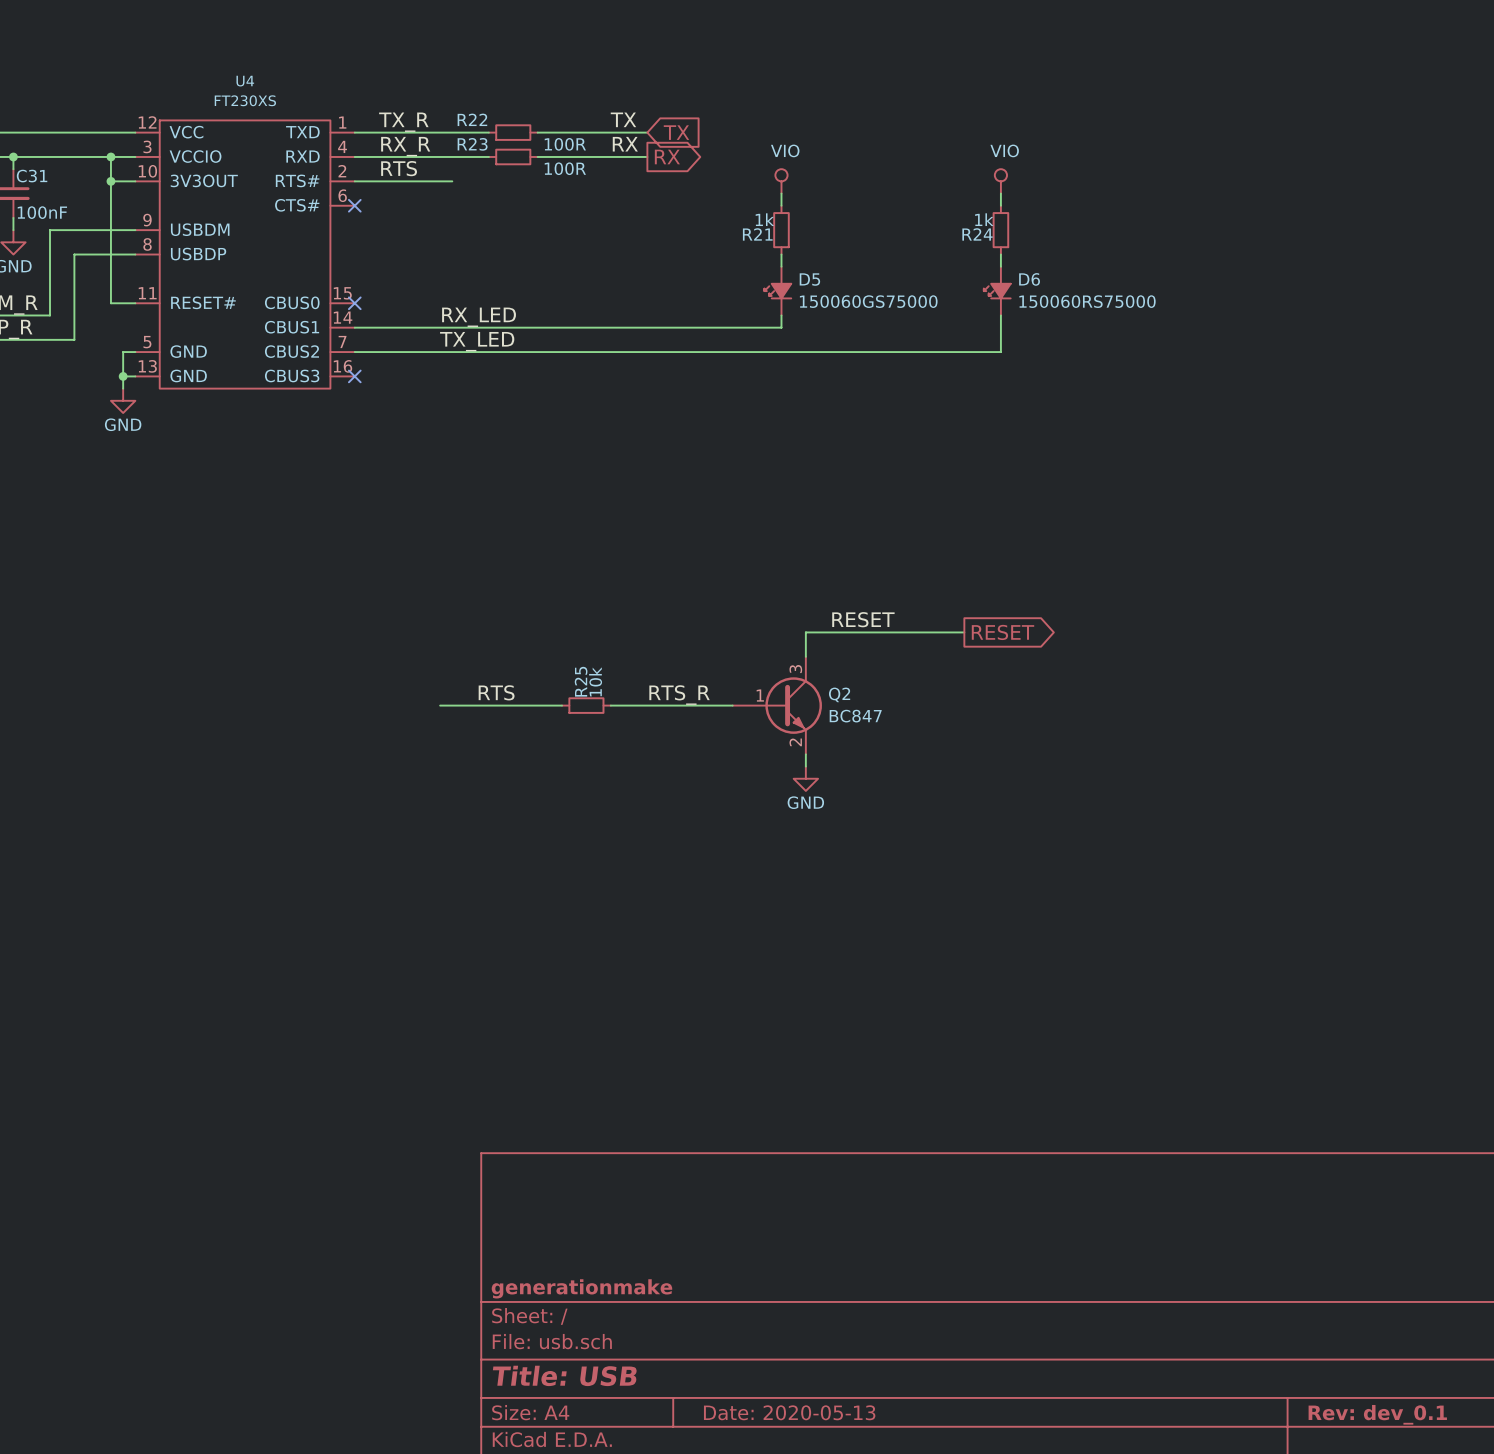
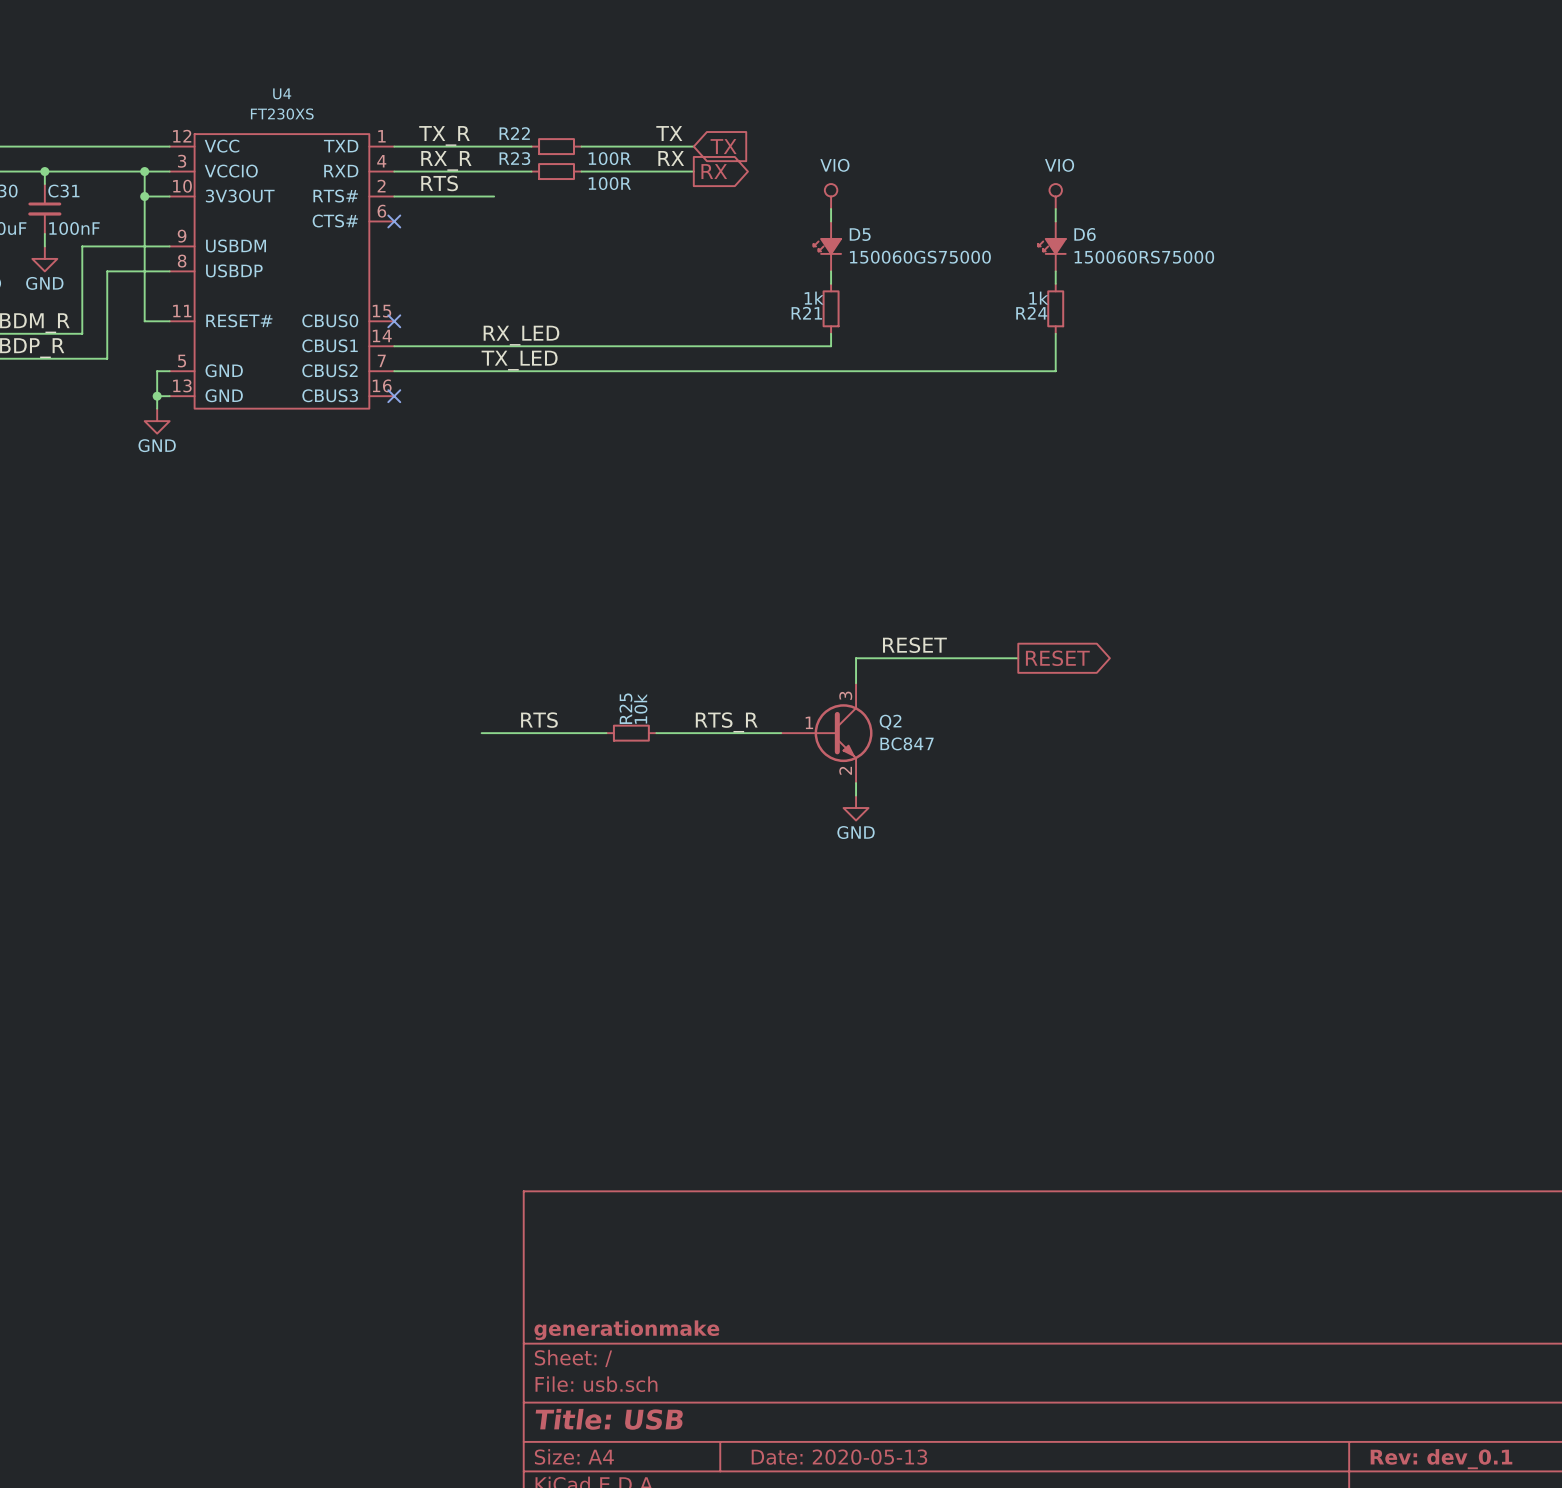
R21 position: (781, 230) -> (831, 308)
R24 position: (1000, 230) -> (1055, 308)
D5 position: (777, 291) -> (827, 246)
D6 position: (997, 291) -> (1051, 246)

